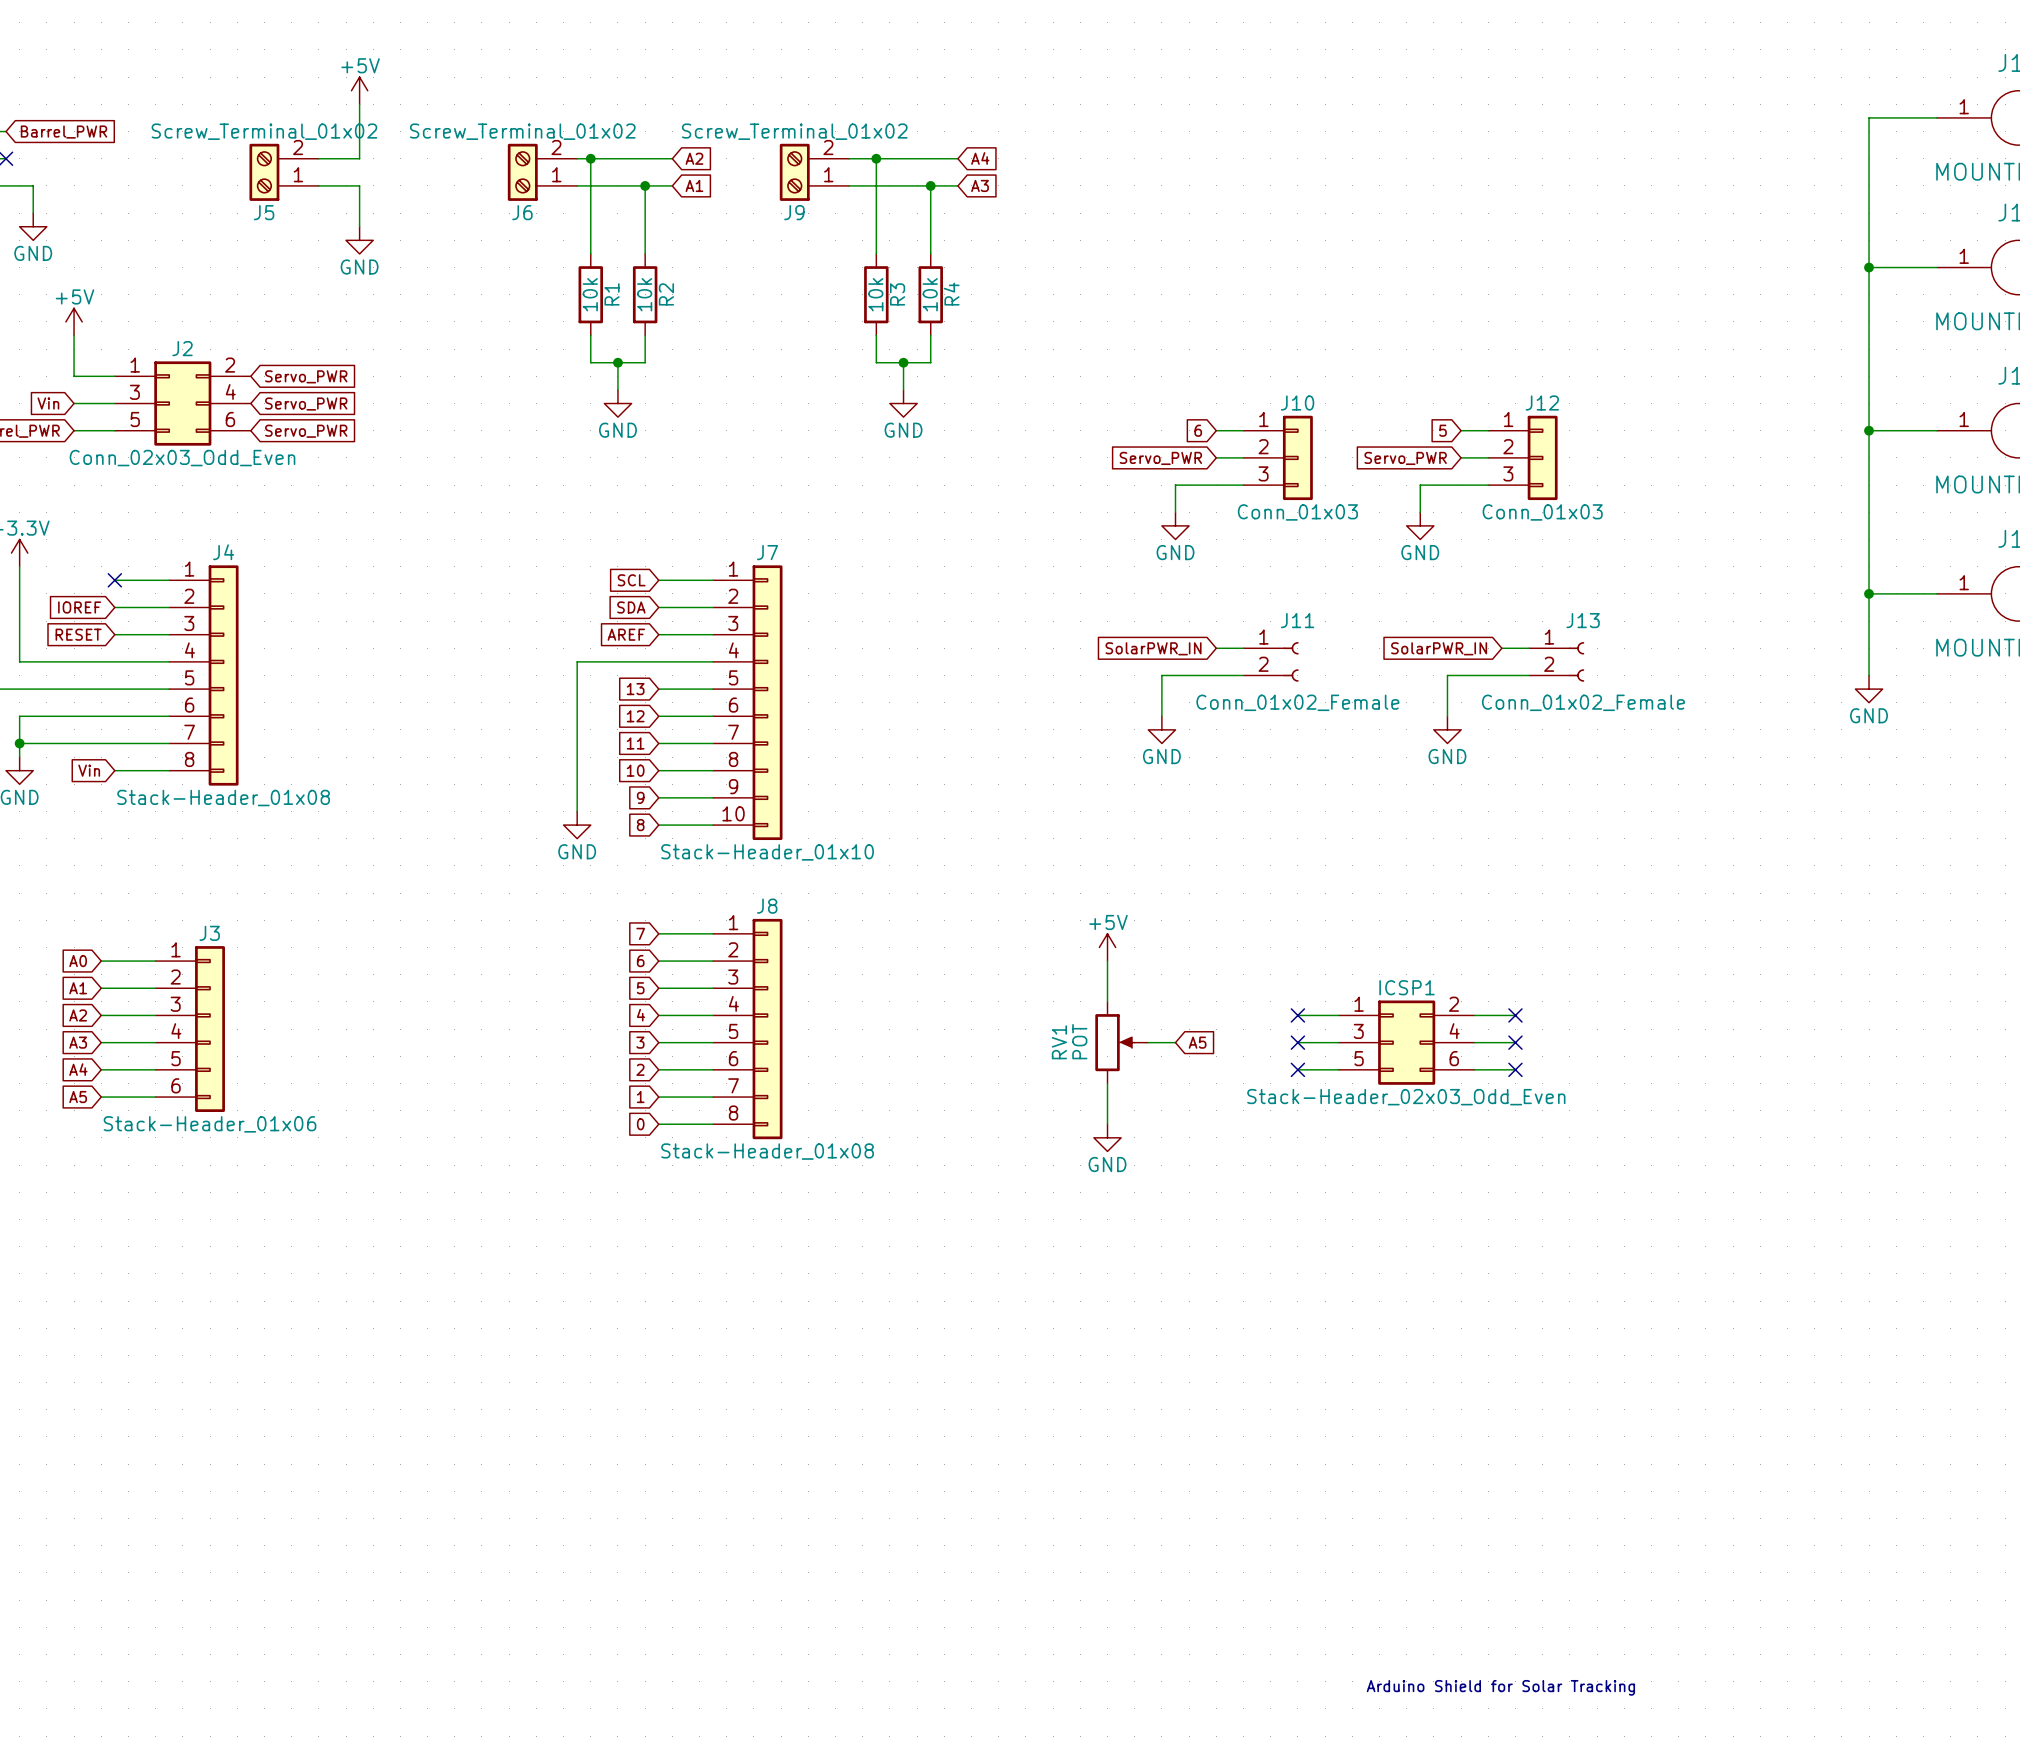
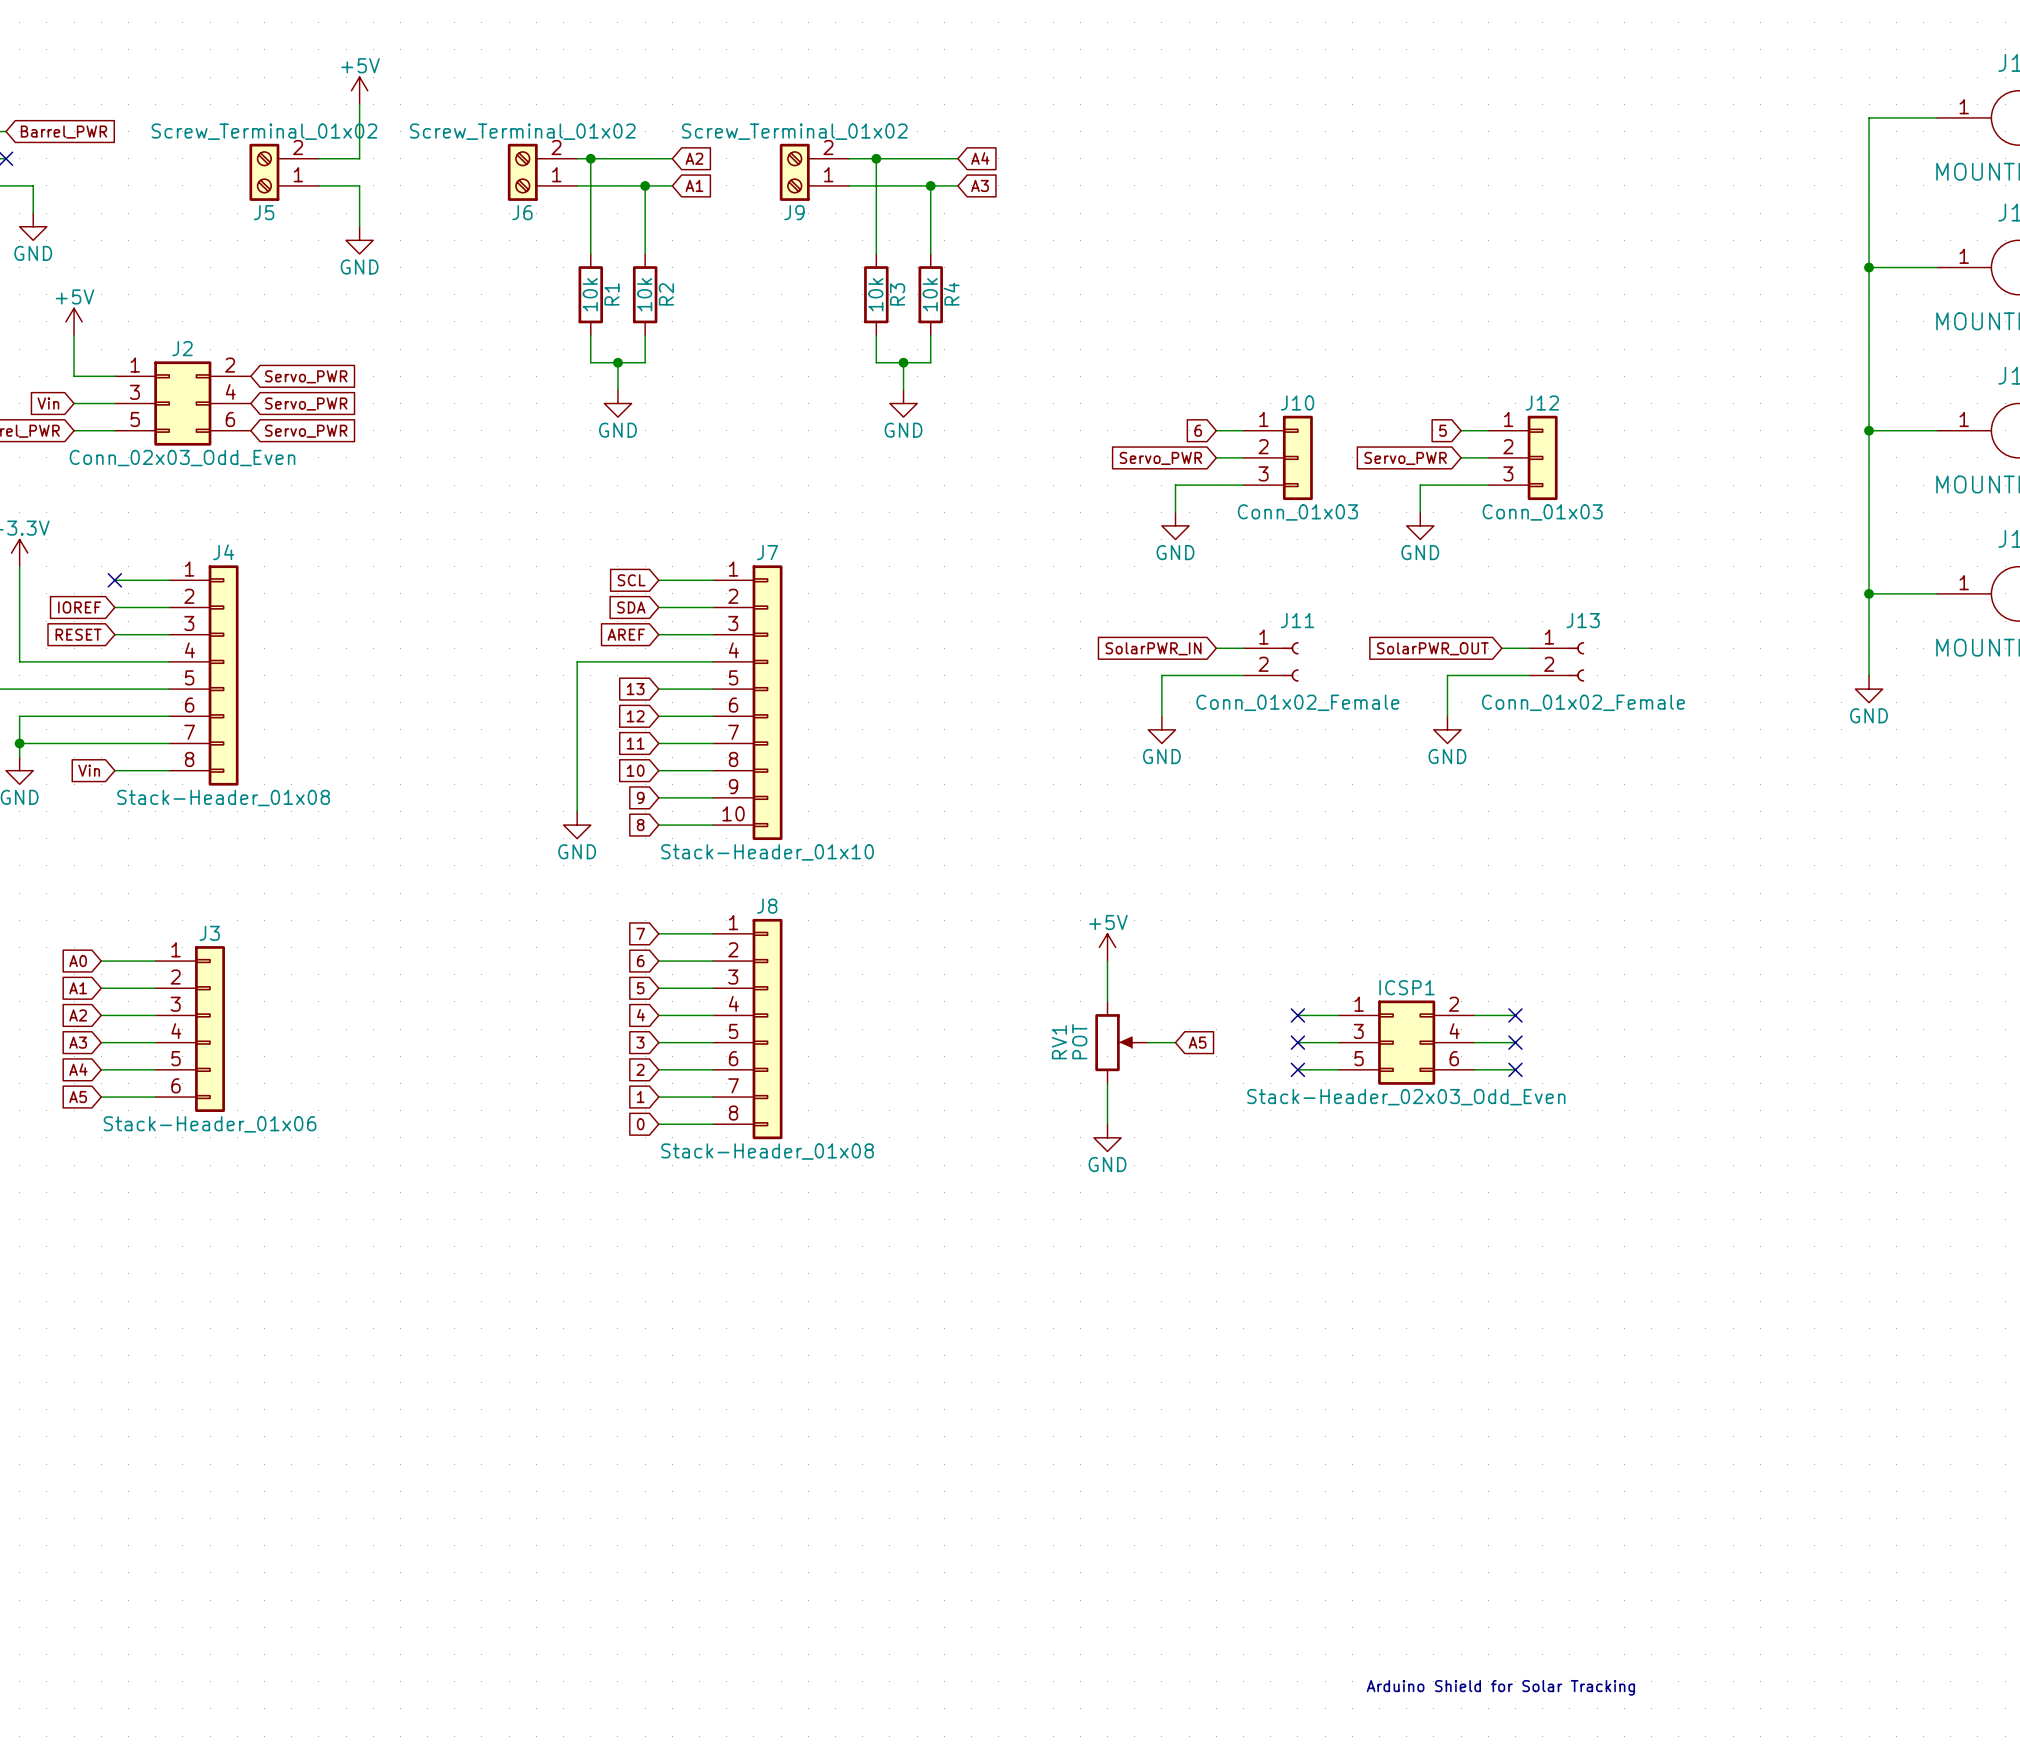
global label: SolarPWR_IN (1439, 648) -> SolarPWR_OUT (1432, 648)

